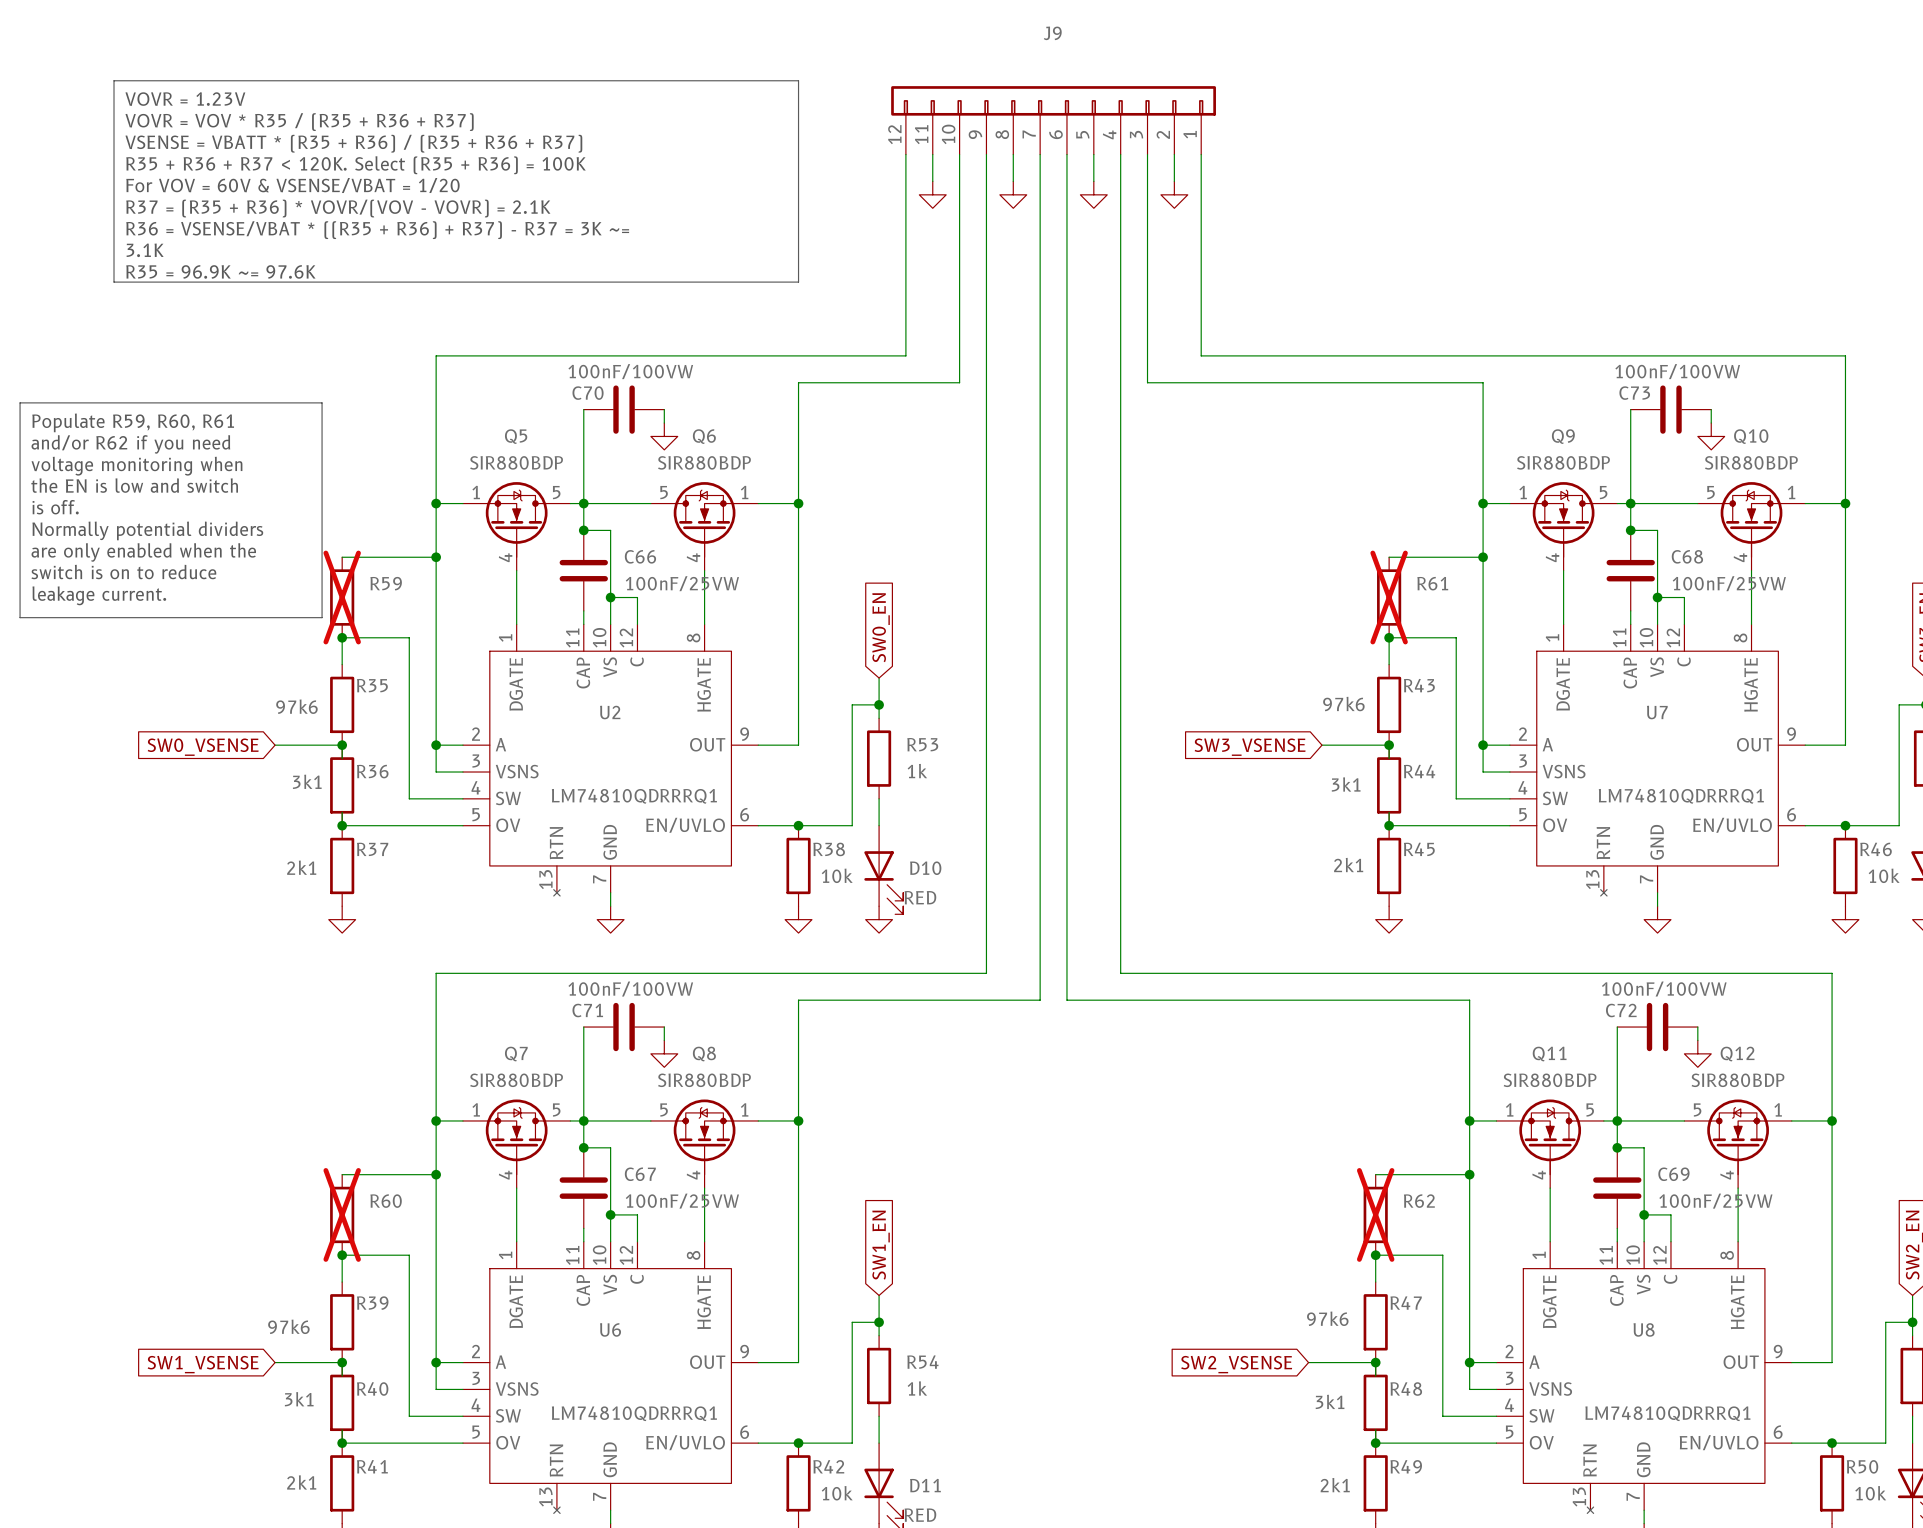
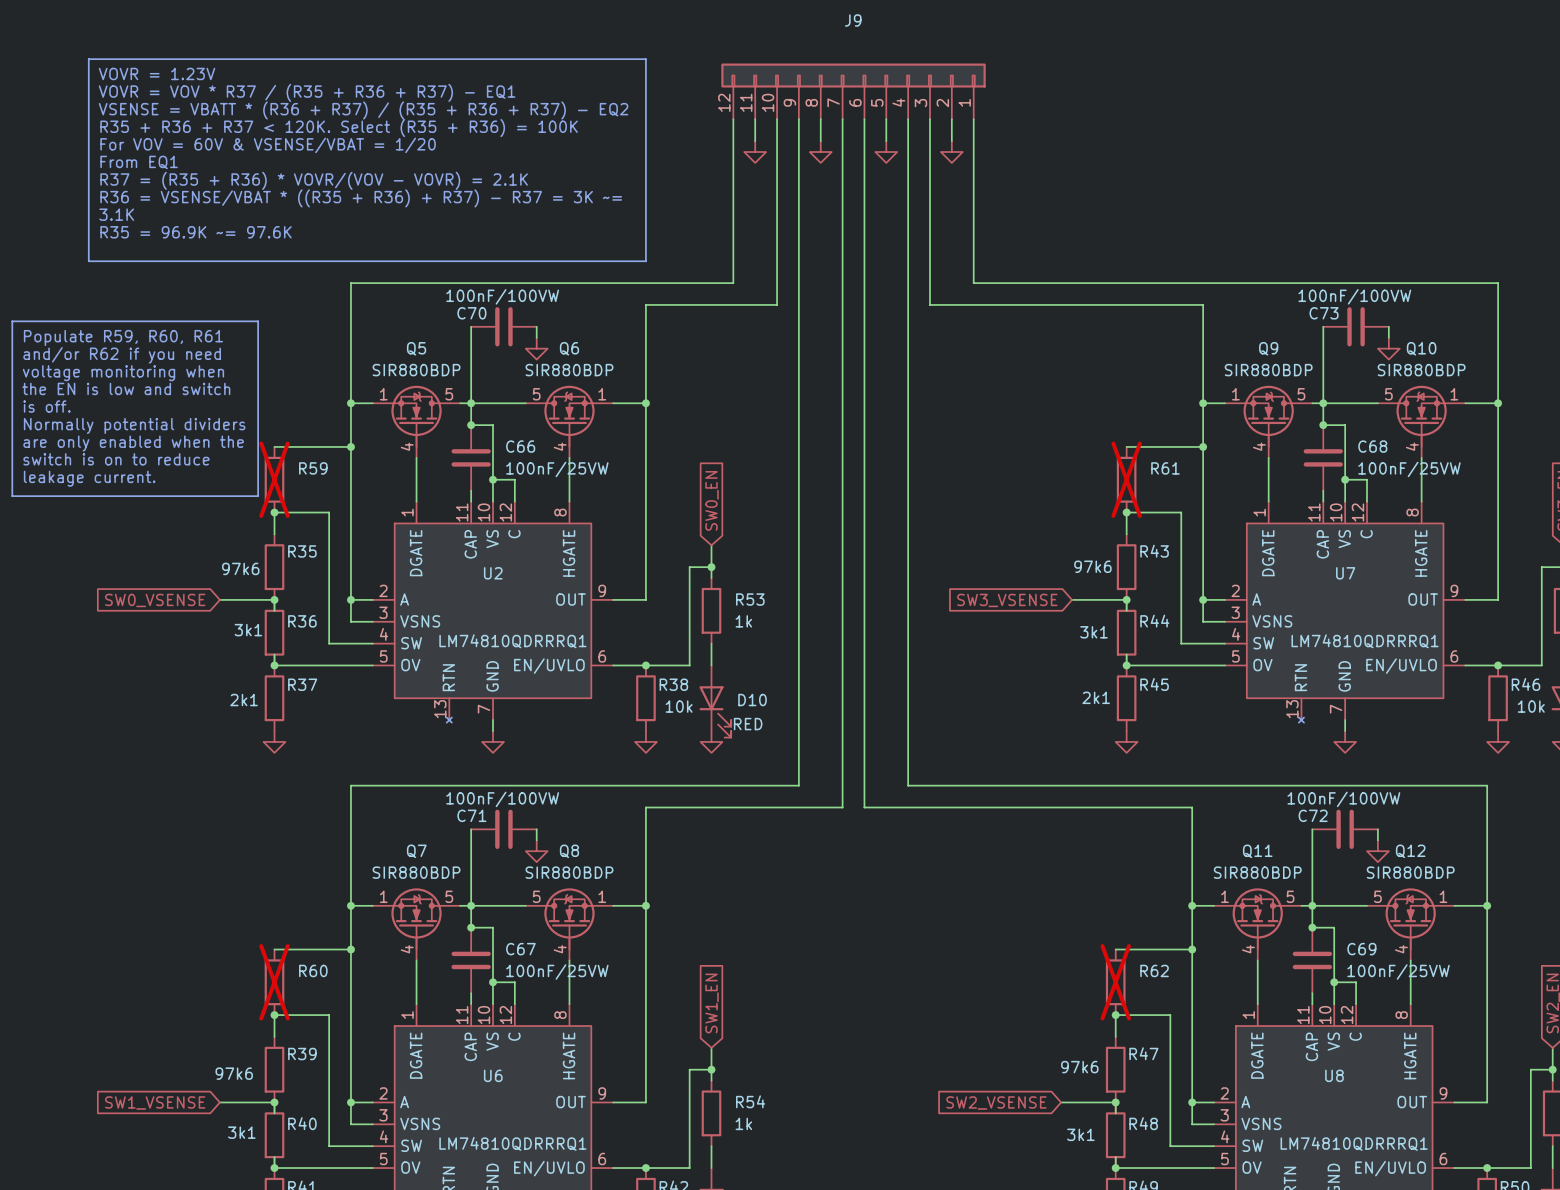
text: VOVR = VOV * R35 / (R35 + R36 + R37) (299, 122) -> VOVR = VOV * R37 / (R35 + R36 + R37) - EQ1 (307, 92)
text: VSENSE = VBATT * (R35 + R36) / (R35 + R36 + R37) (353, 143) -> VSENSE = VBATT * (R36 + R37) / (R35 + R36 + R37) - EQ2 (363, 110)
text: R37 = (R35 + R36) * VOVR/(VOV - VOVR) = 2.1K (338, 208) -> From EQ1 (139, 162)
text: R36 = VSENSE/VBAT * ((R35 + R36) + R37) - R37 = 3K ~= (377, 230) -> R37 = (R35 + R36) * VOVR/(VOV - VOVR) = 2.1K (314, 180)
text: 3.1K (145, 250) -> R36 = VSENSE/VBAT * ((R35 + R36) + R37) - R37 = 3K ~= (361, 198)
text: R35 = 96.9K ~= 97.6K (220, 271) -> 3.1K (116, 214)
line: (114, 282) (798, 282) -> (88, 223) (88, 261) (645, 261) (645, 223)
text: none -> R35 = 96.9K ~= 97.6K (196, 232)

